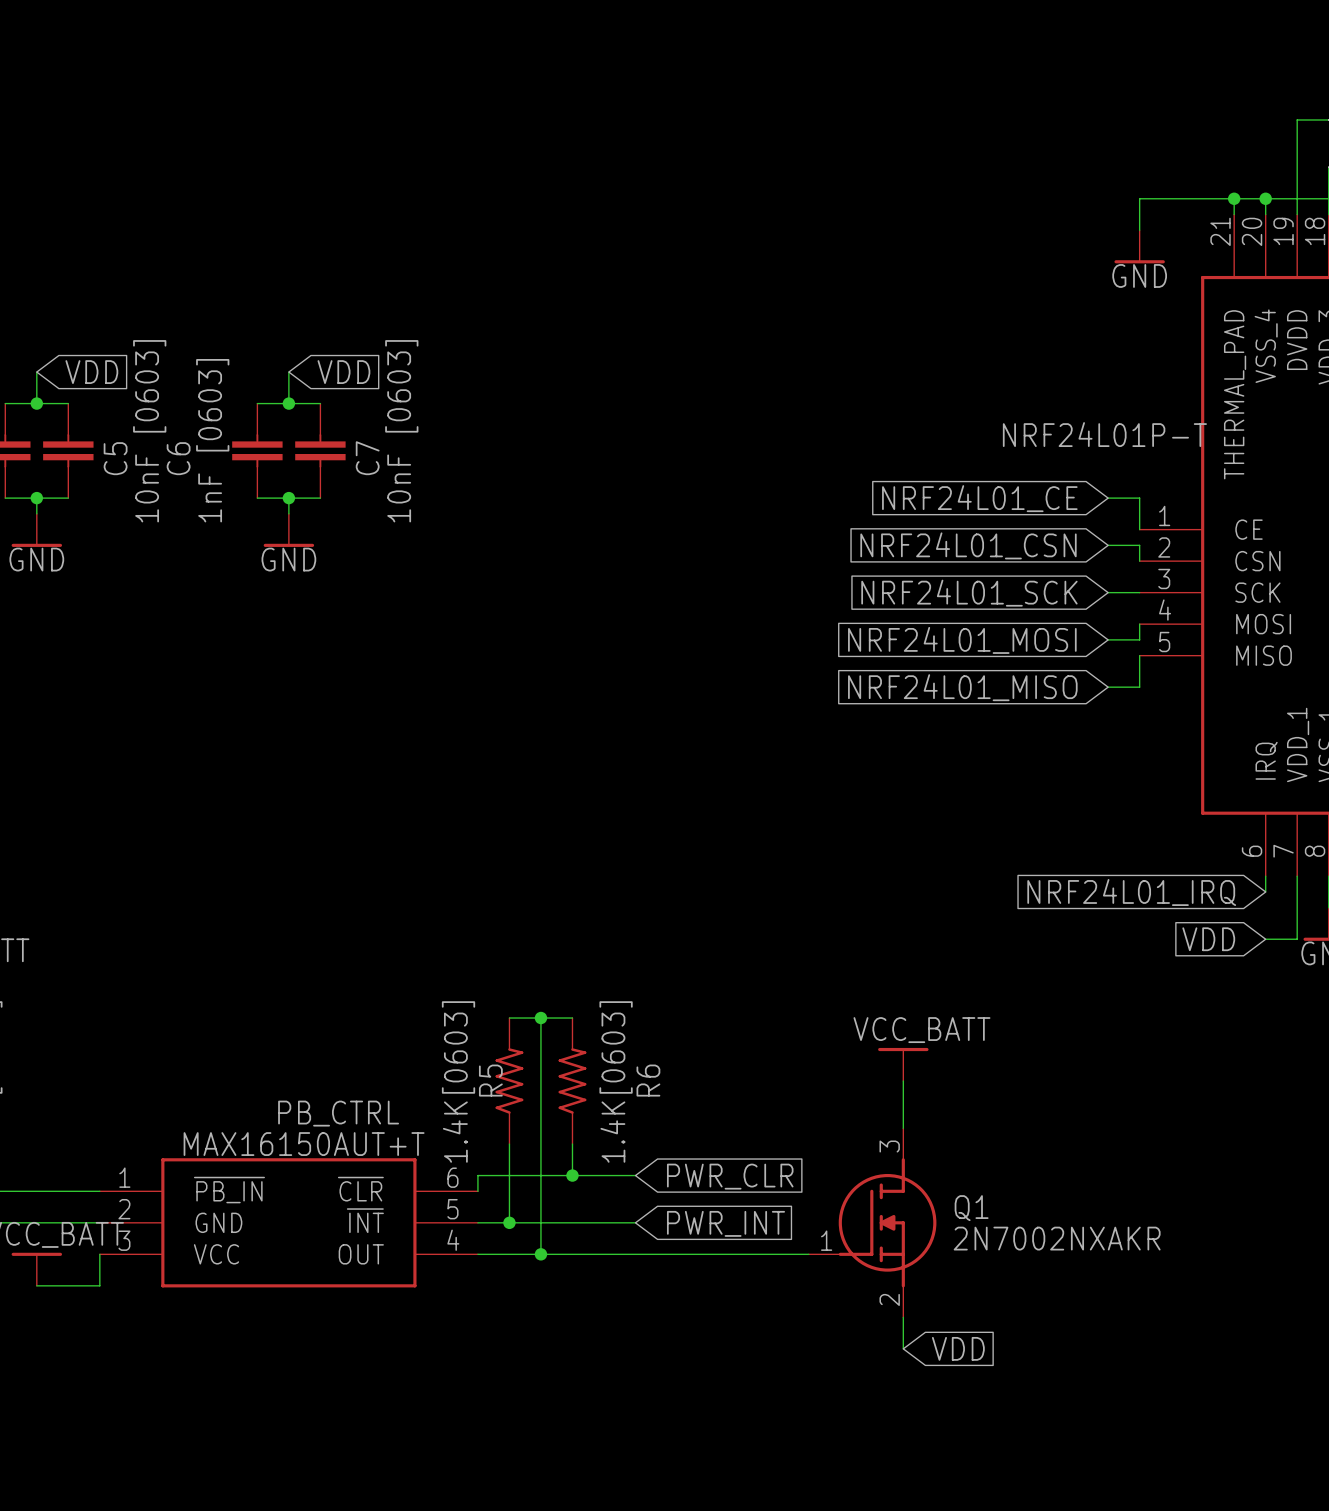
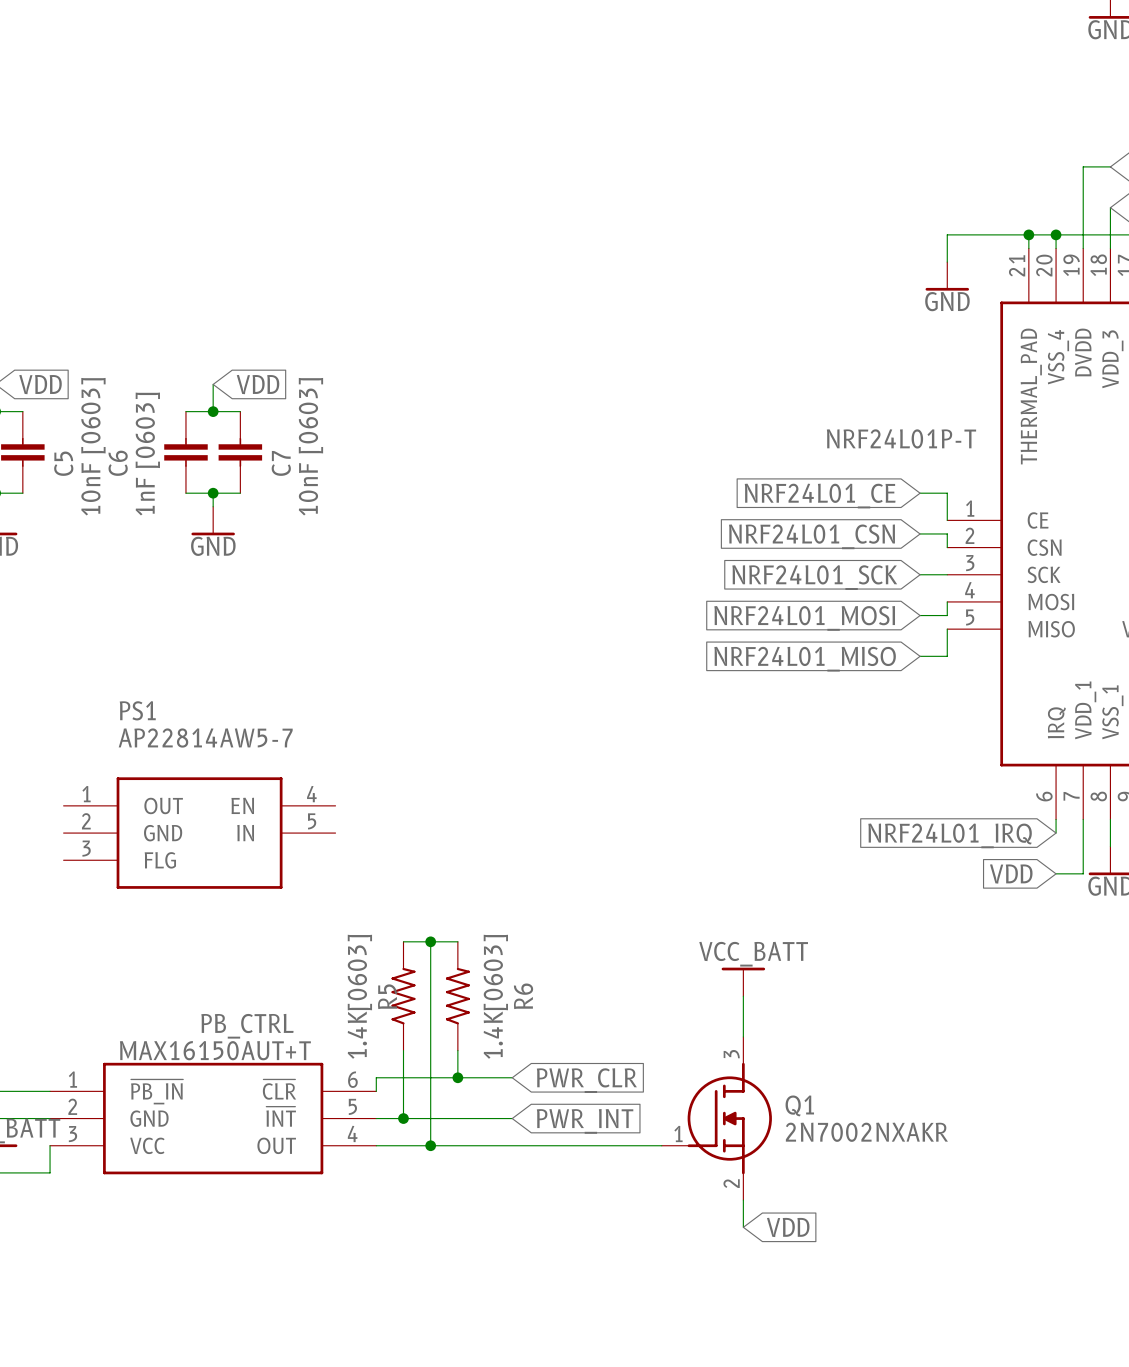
PS1: none -> AP22814AW5-7 (199, 833)

